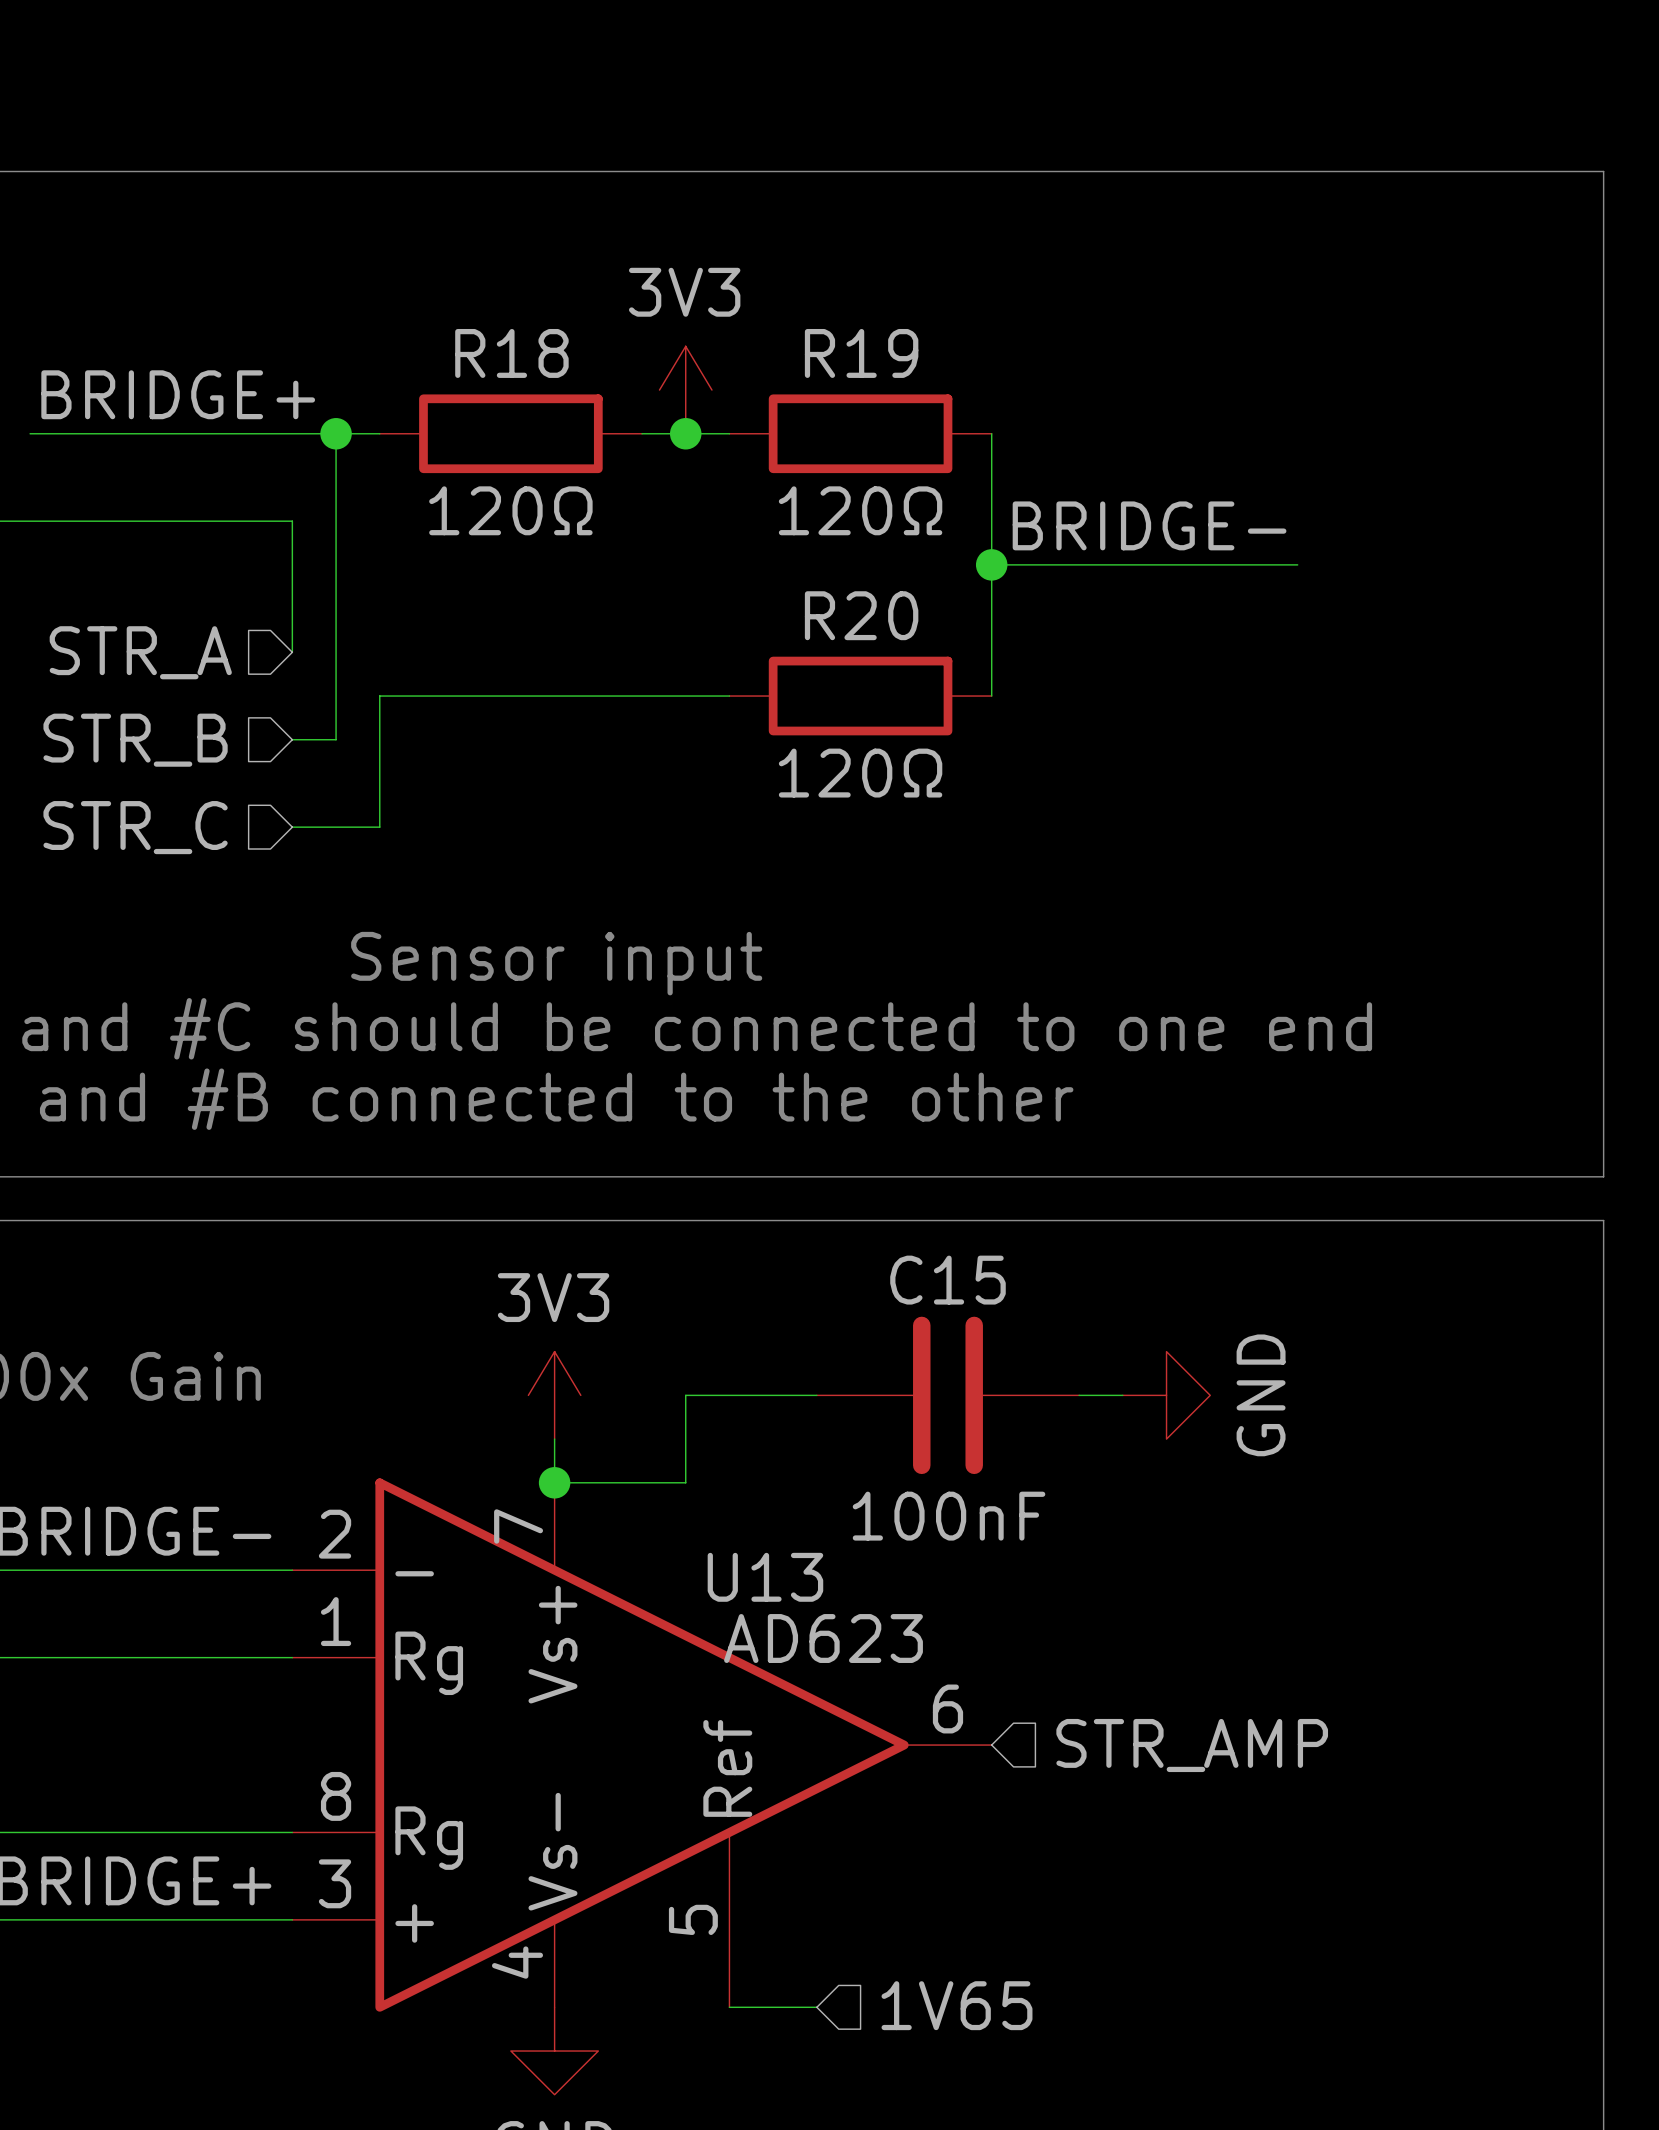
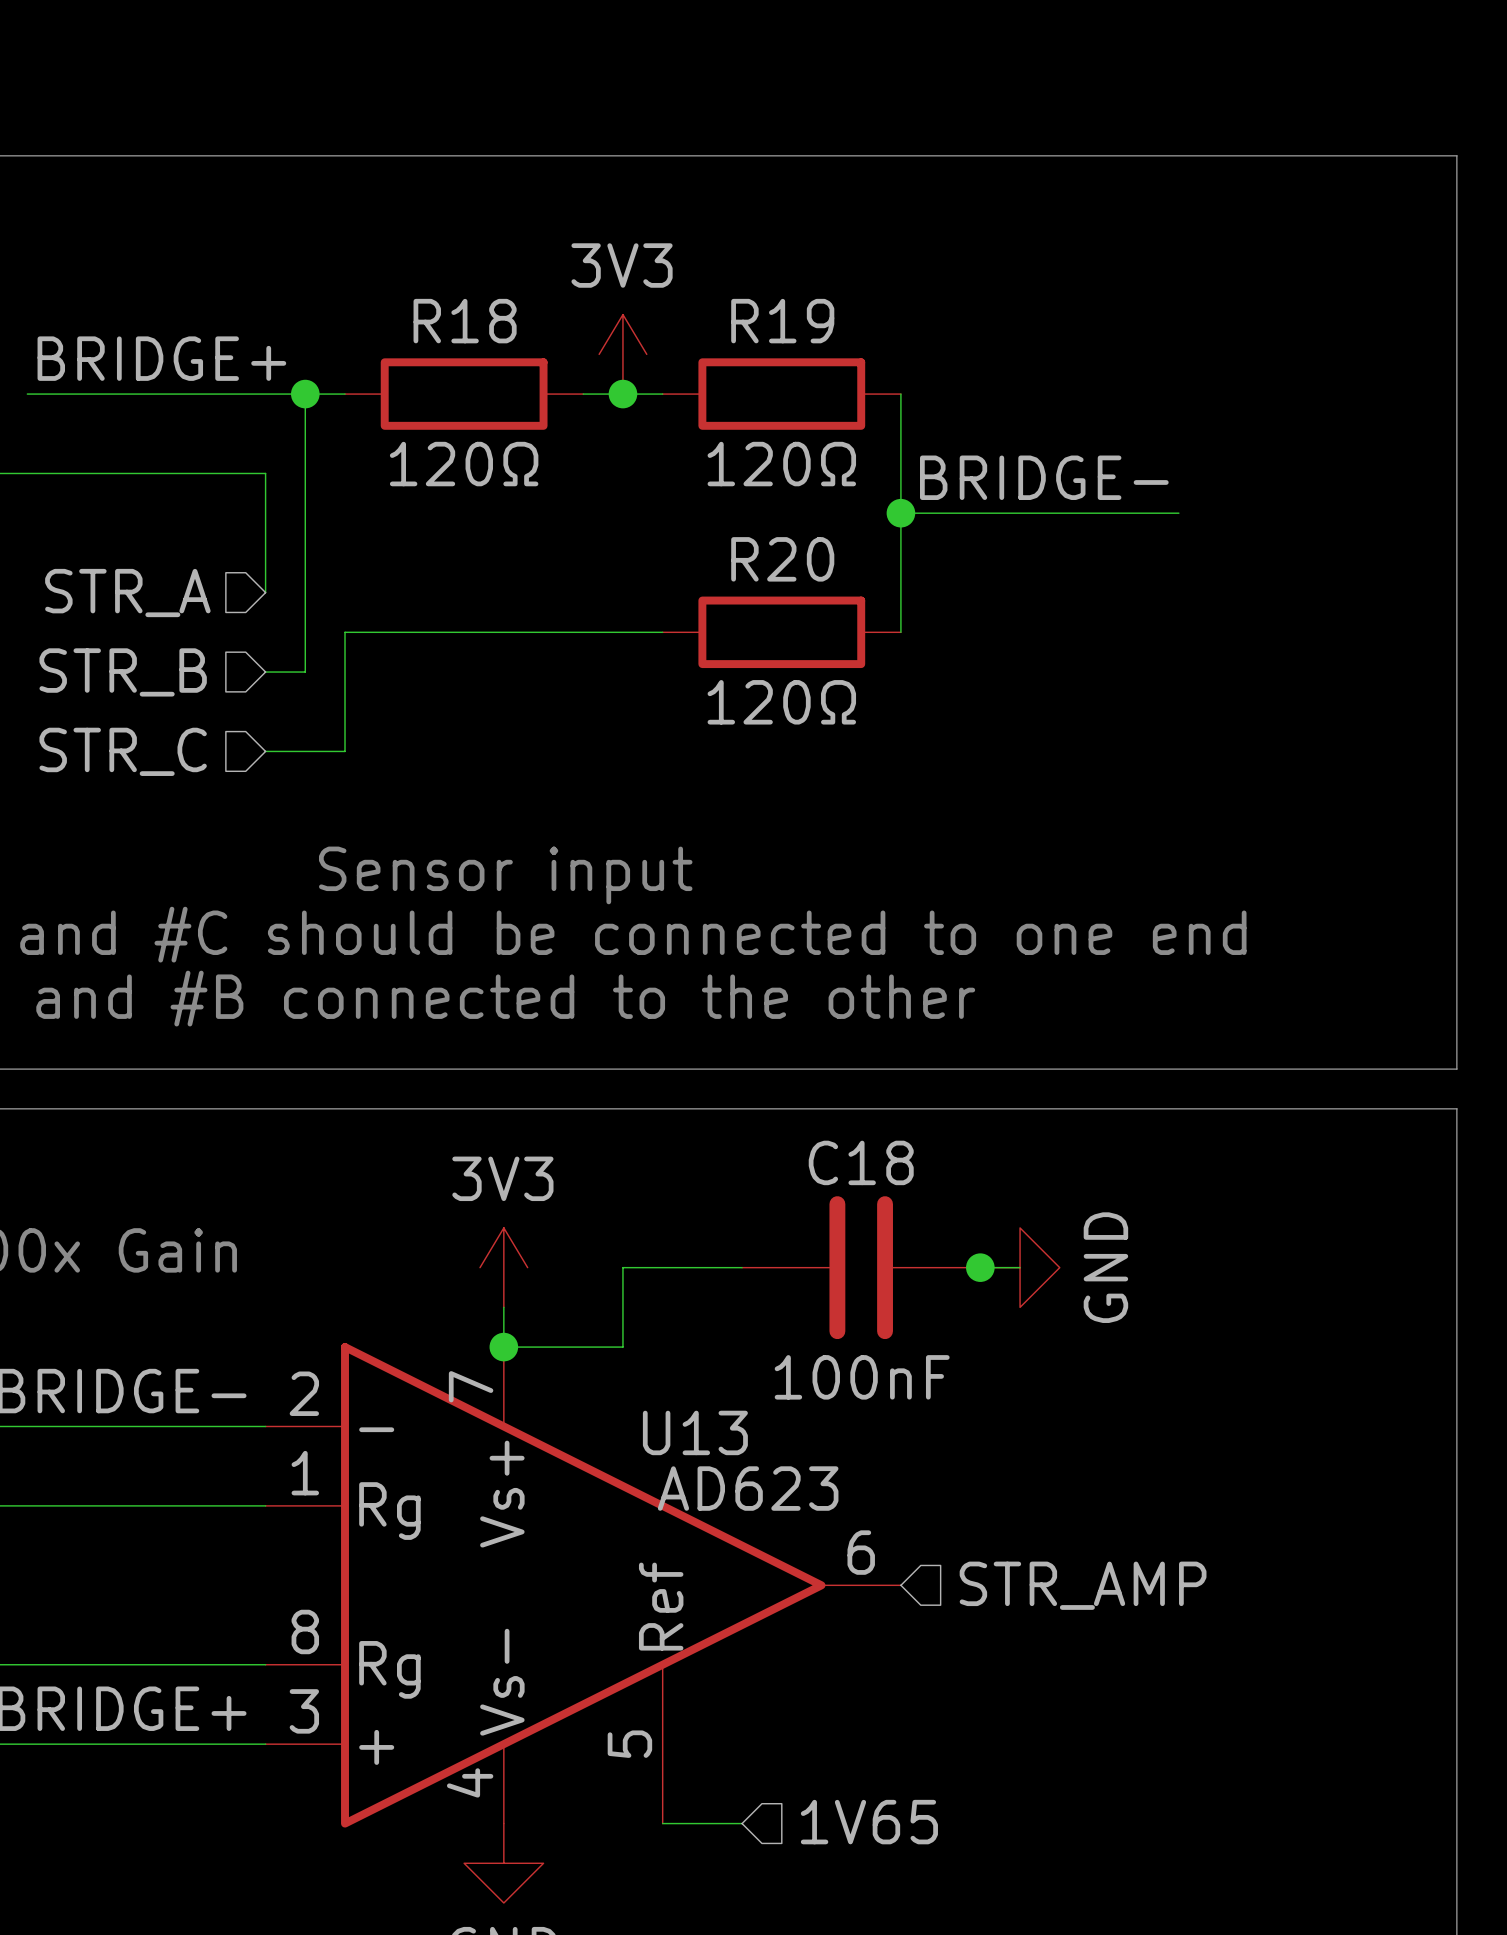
C15 name: C15 (947, 1280) -> C18 (861, 1162)
junction: none -> (980, 1267)
power symbol position: GND (1166, 1395) -> GND (1020, 1267)

